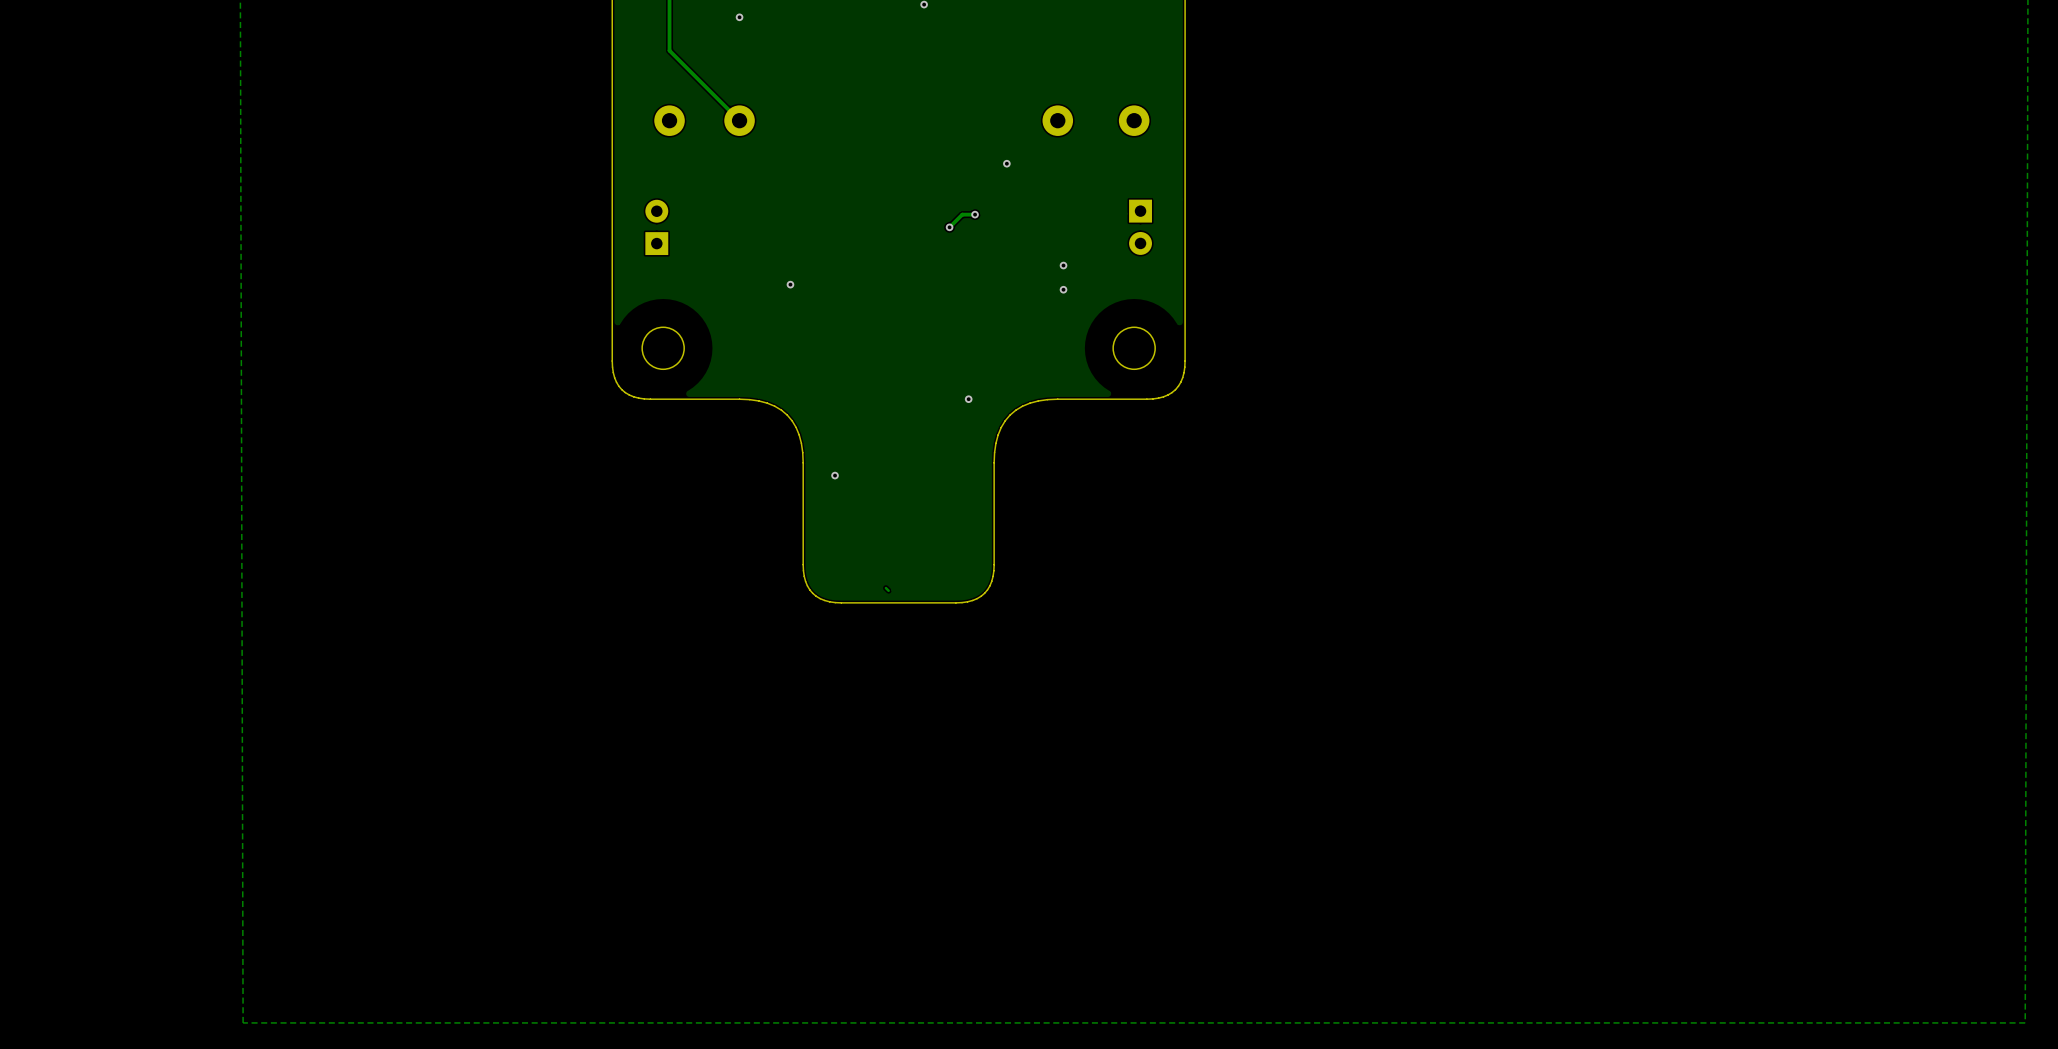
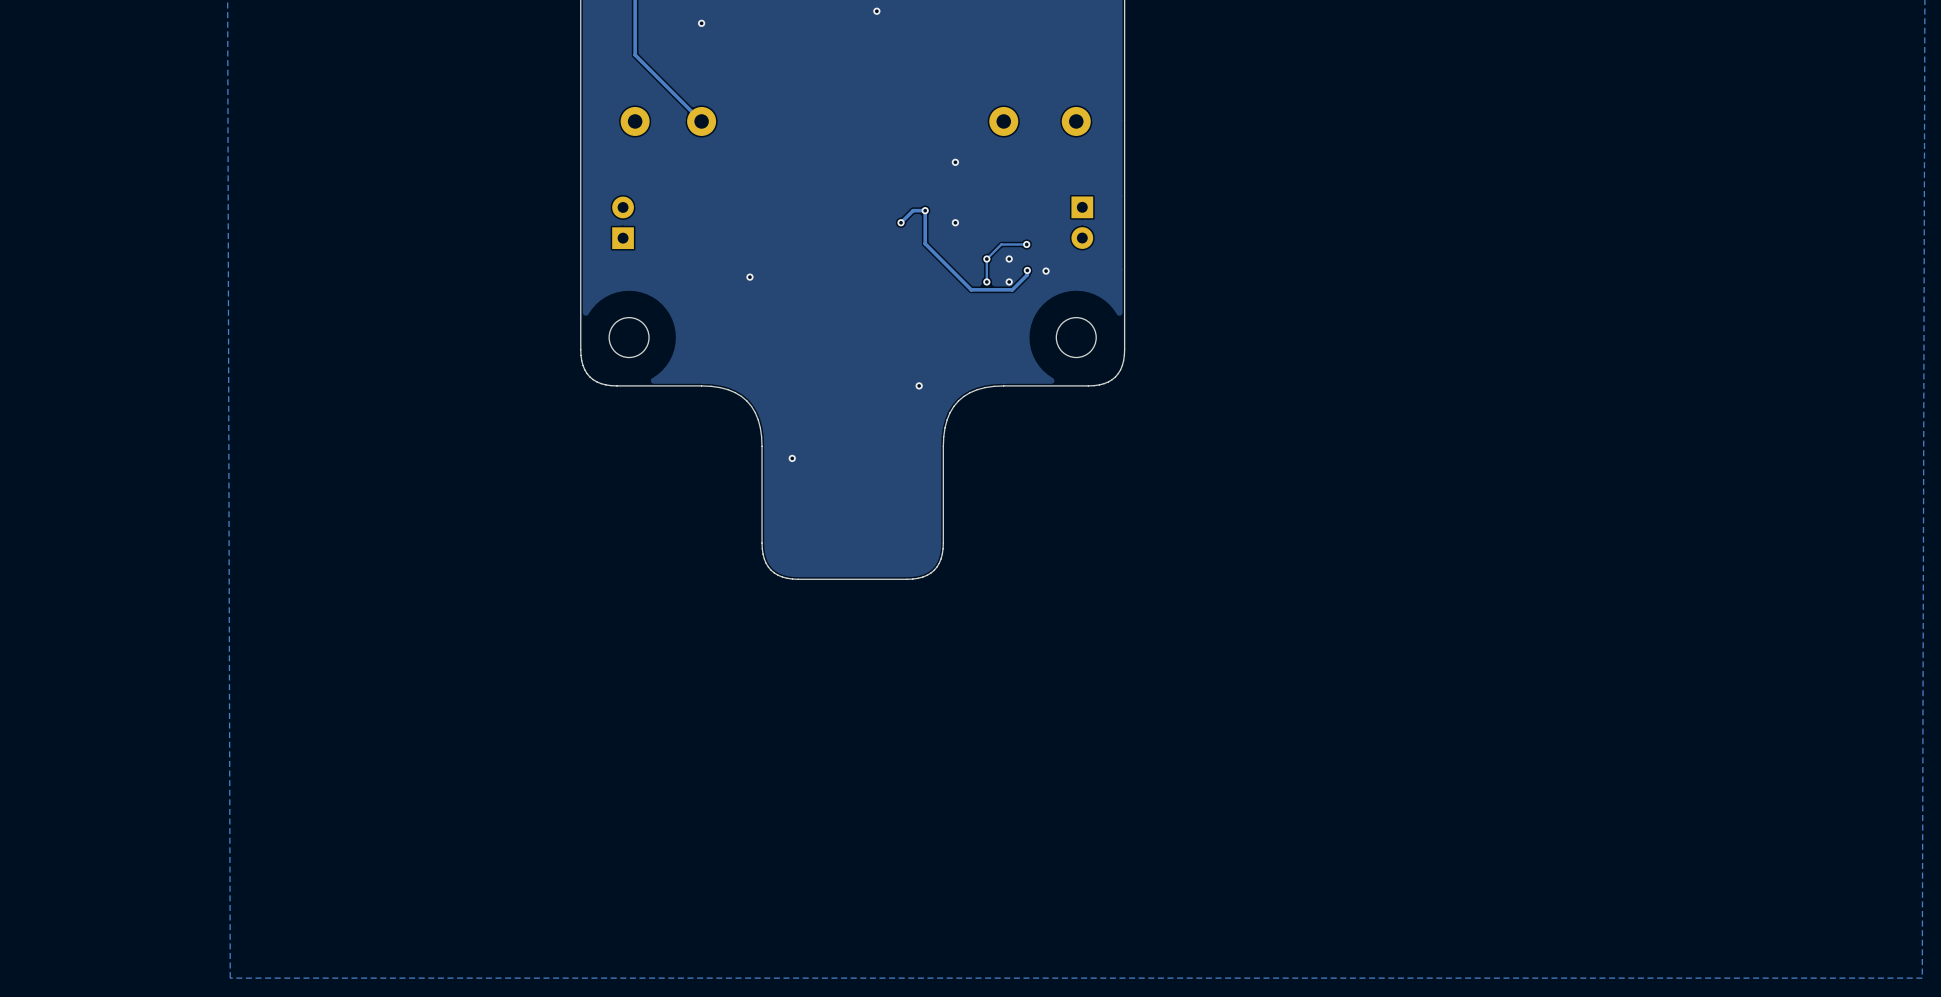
track: none -> (925, 210) (925, 243) (971, 289) (1012, 289) (1027, 274) (1027, 270)
via: none -> (955, 222)
track: none -> (1026, 244) (1001, 244) (986, 259) (986, 281)
via: none -> (1026, 244)
via: none -> (986, 259)
via: none -> (1027, 270)
via: none -> (1046, 271)
via: none -> (986, 281)
track: (885, 588) (888, 590) -> none

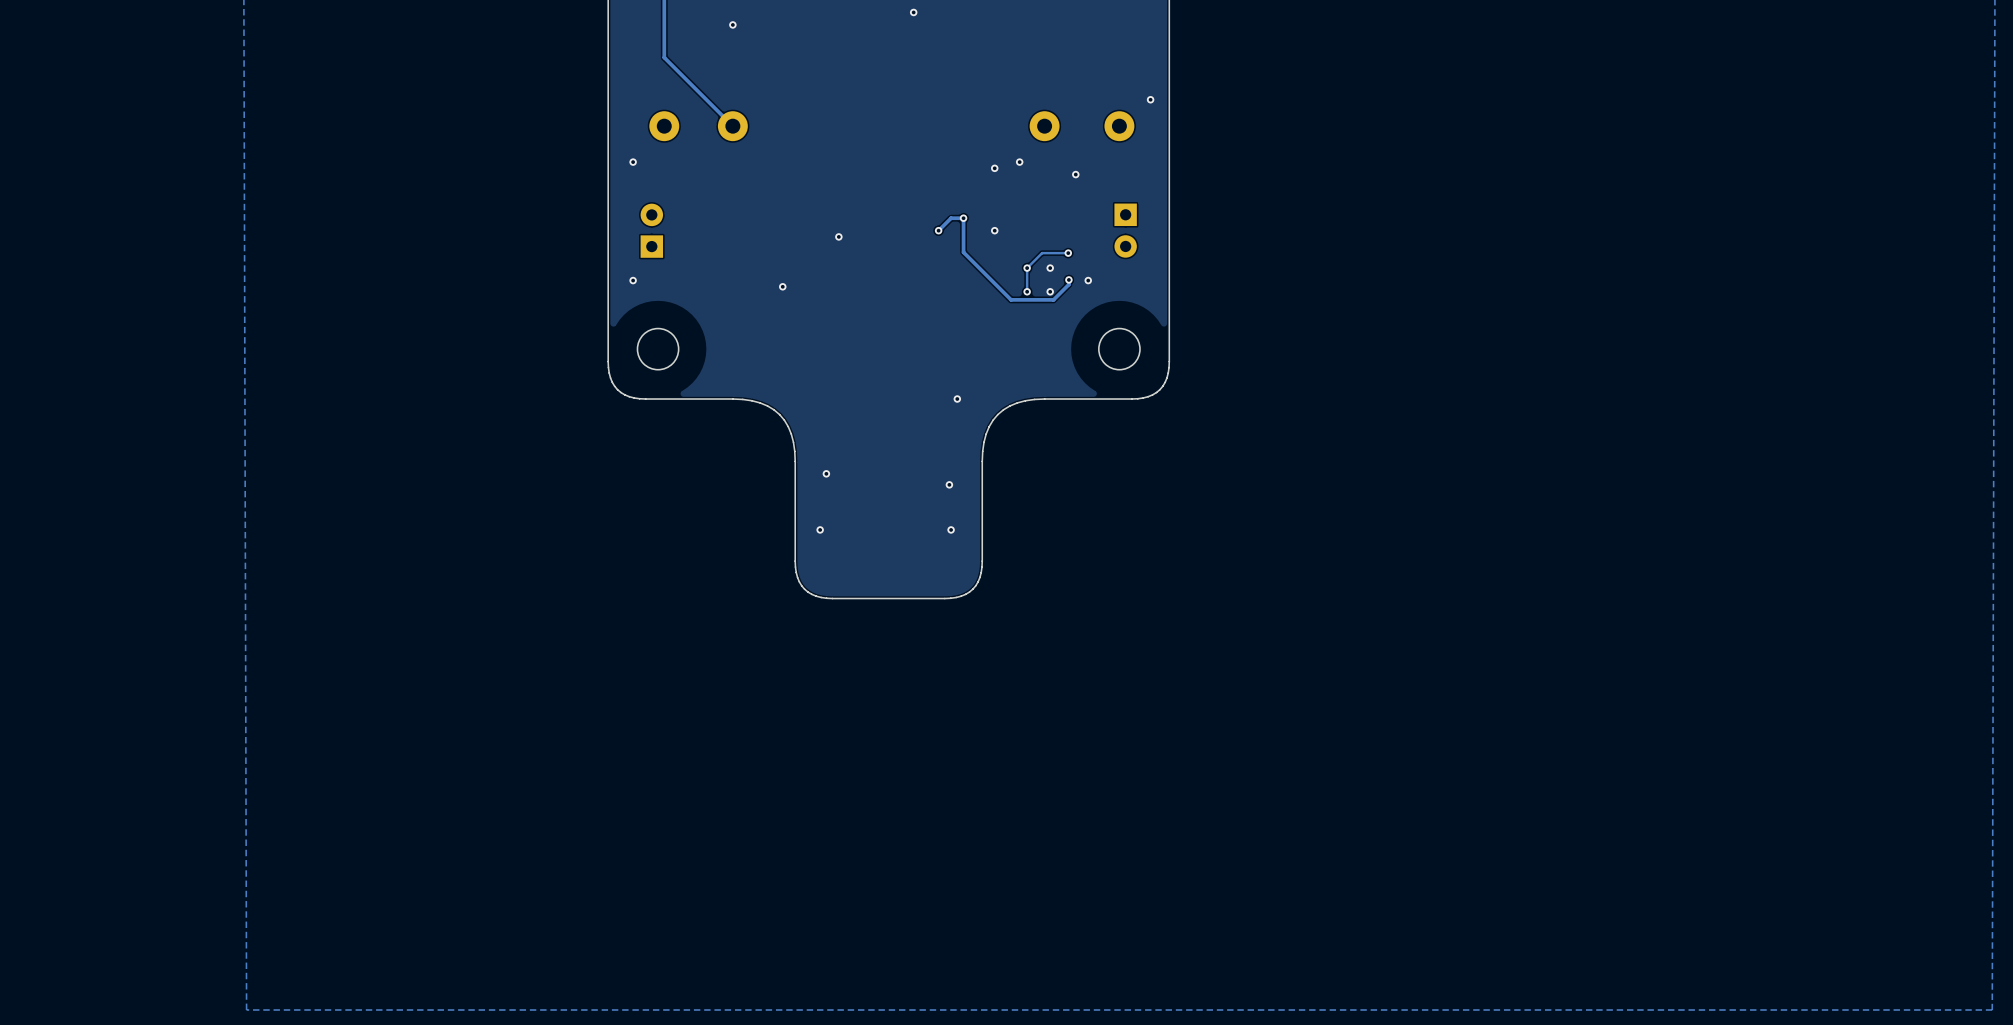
via: none -> (1150, 99)
via: none -> (633, 162)
via: none -> (1019, 162)
via: none -> (1075, 174)
via: none -> (838, 236)
via: none -> (633, 280)
via: none -> (949, 484)
via: none -> (820, 529)
via: none -> (951, 529)

